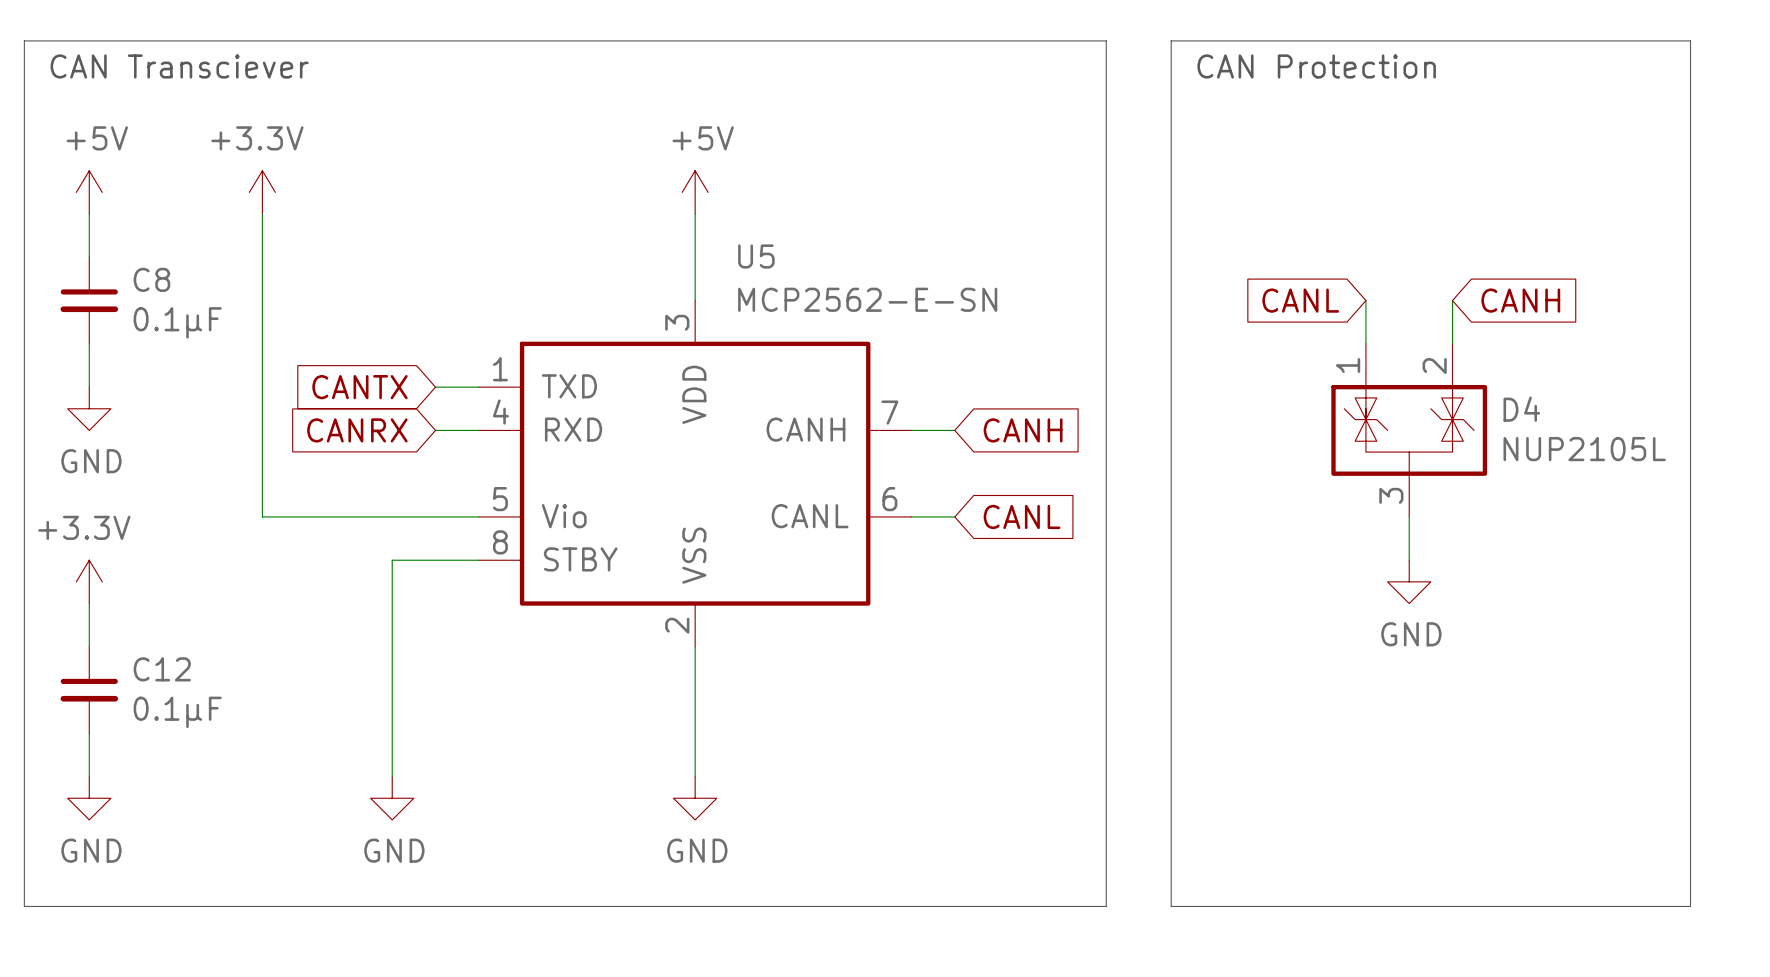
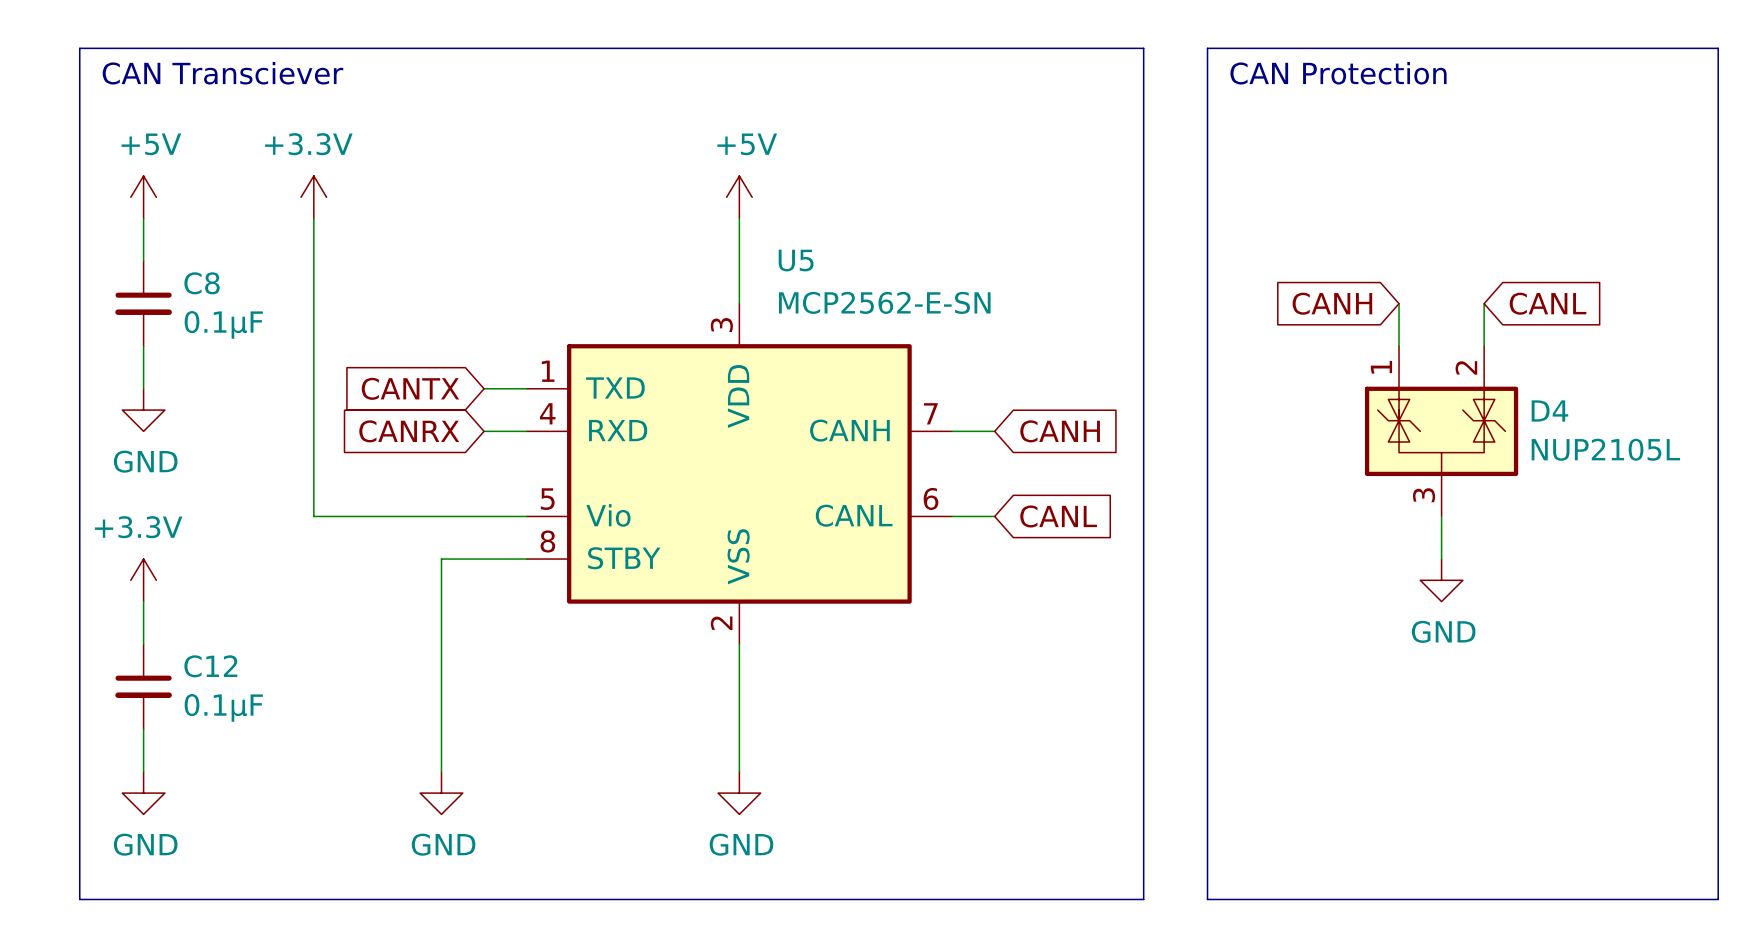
global label: CANL (1300, 300) -> CANH (1332, 303)
global label: CANH (1520, 300) -> CANL (1548, 303)

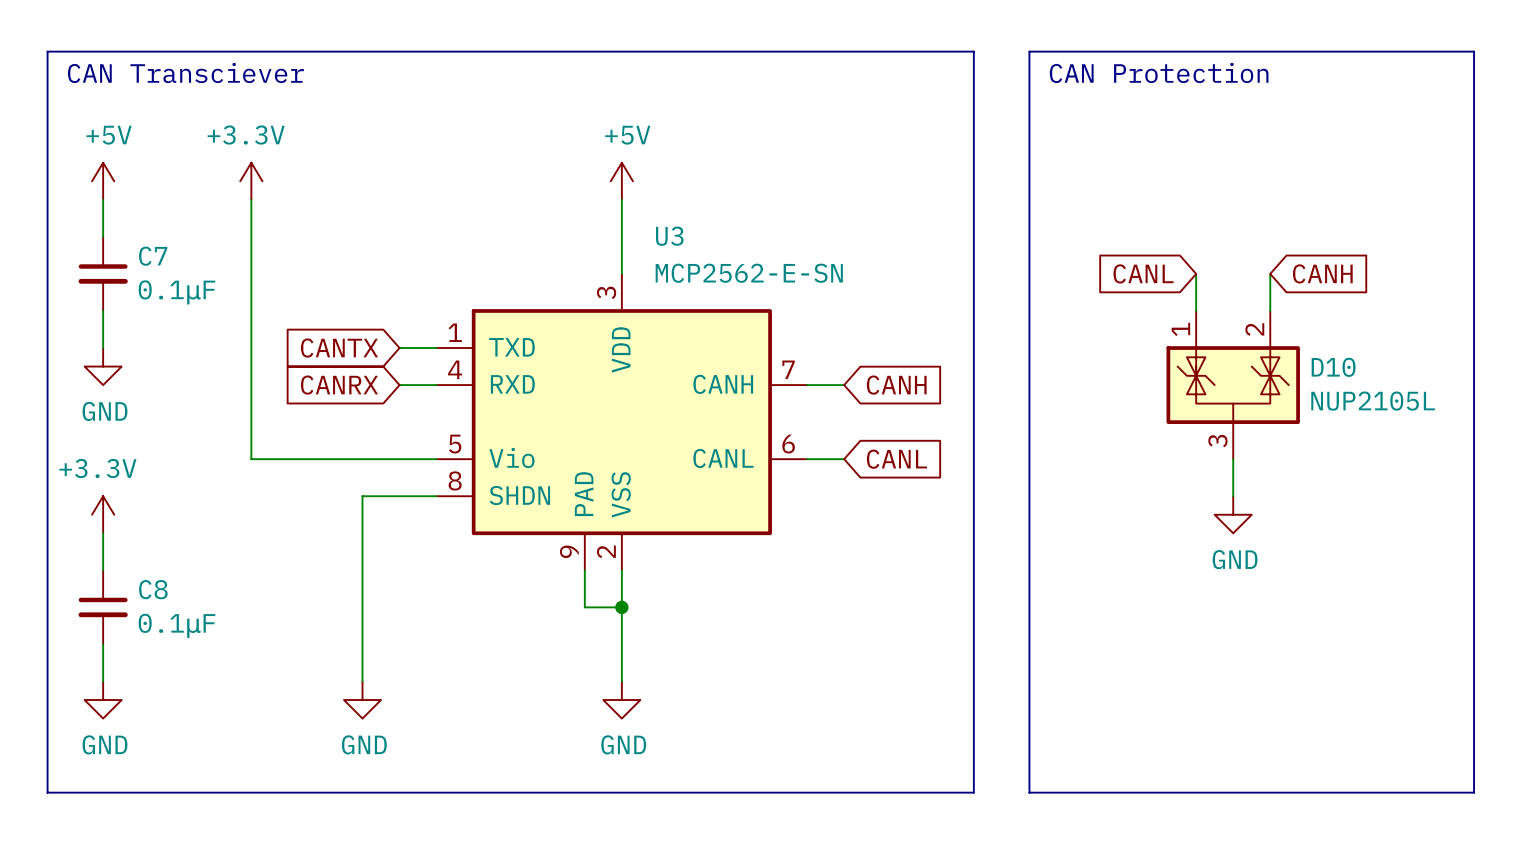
C8 name: C8 (202, 283) -> C7 (153, 256)
global label: CANH (1332, 303) -> CANL (1143, 273)
global label: CANL (1548, 303) -> CANH (1322, 273)
D4 name: D4 (1549, 410) -> D10 (1333, 367)
U5: MCP2562-E-SN (739, 473) -> none
U3: none -> MCP2562-E-SN (621, 422)
wire: none -> (584, 570) (584, 607) (621, 607)
C12 name: C12 (210, 666) -> C8 (153, 589)
junction: none -> (621, 607)

